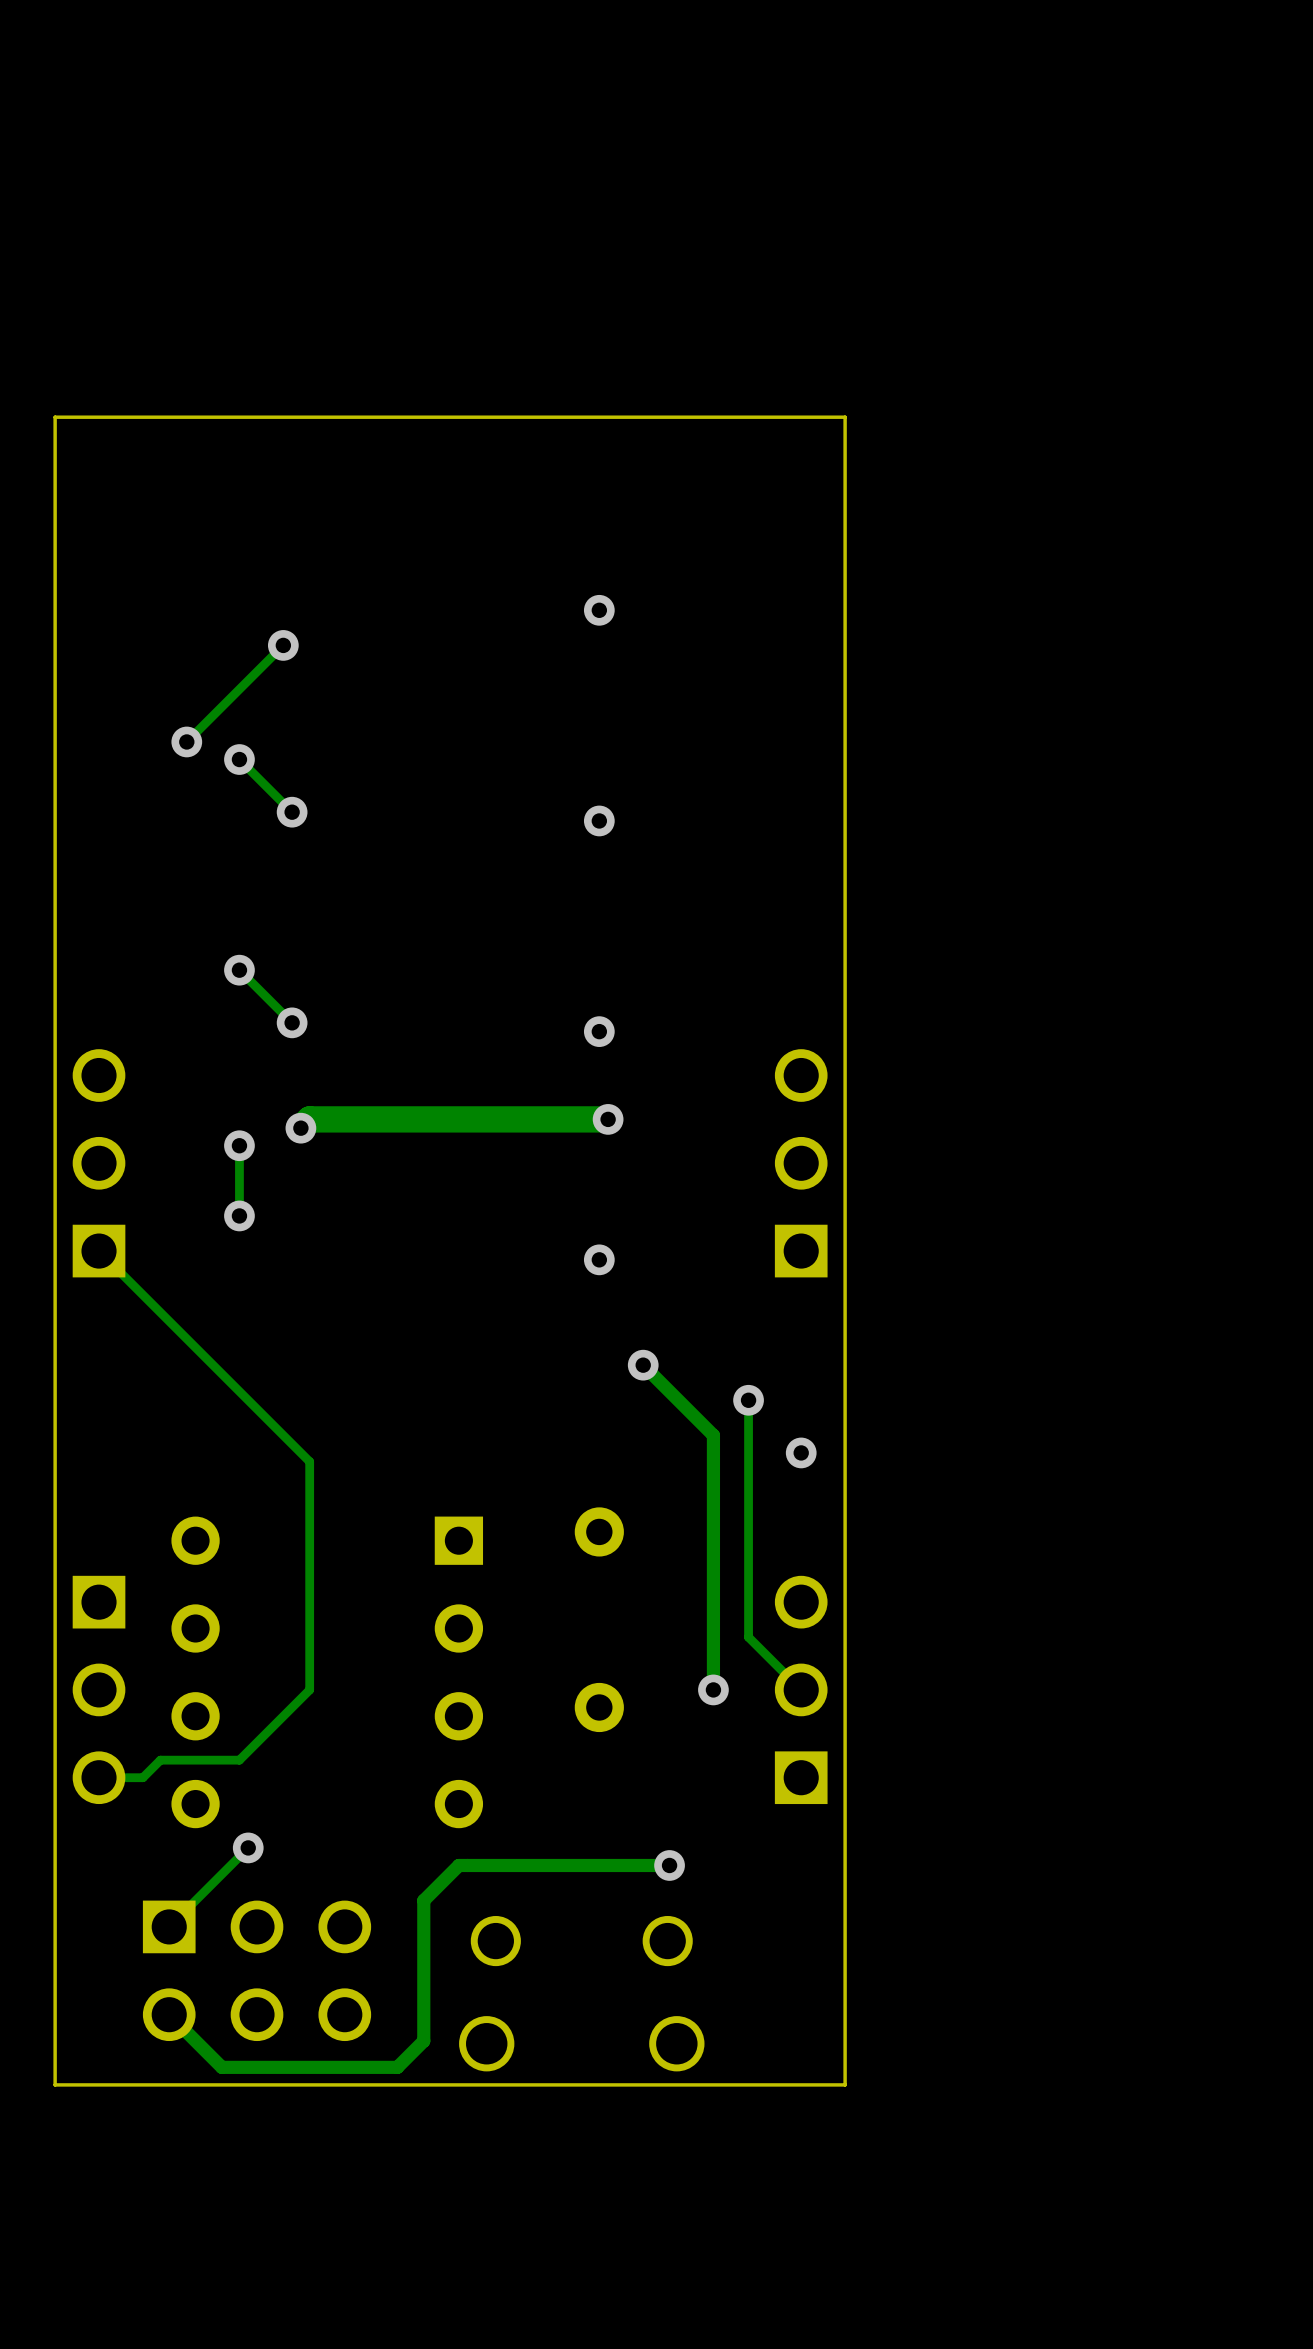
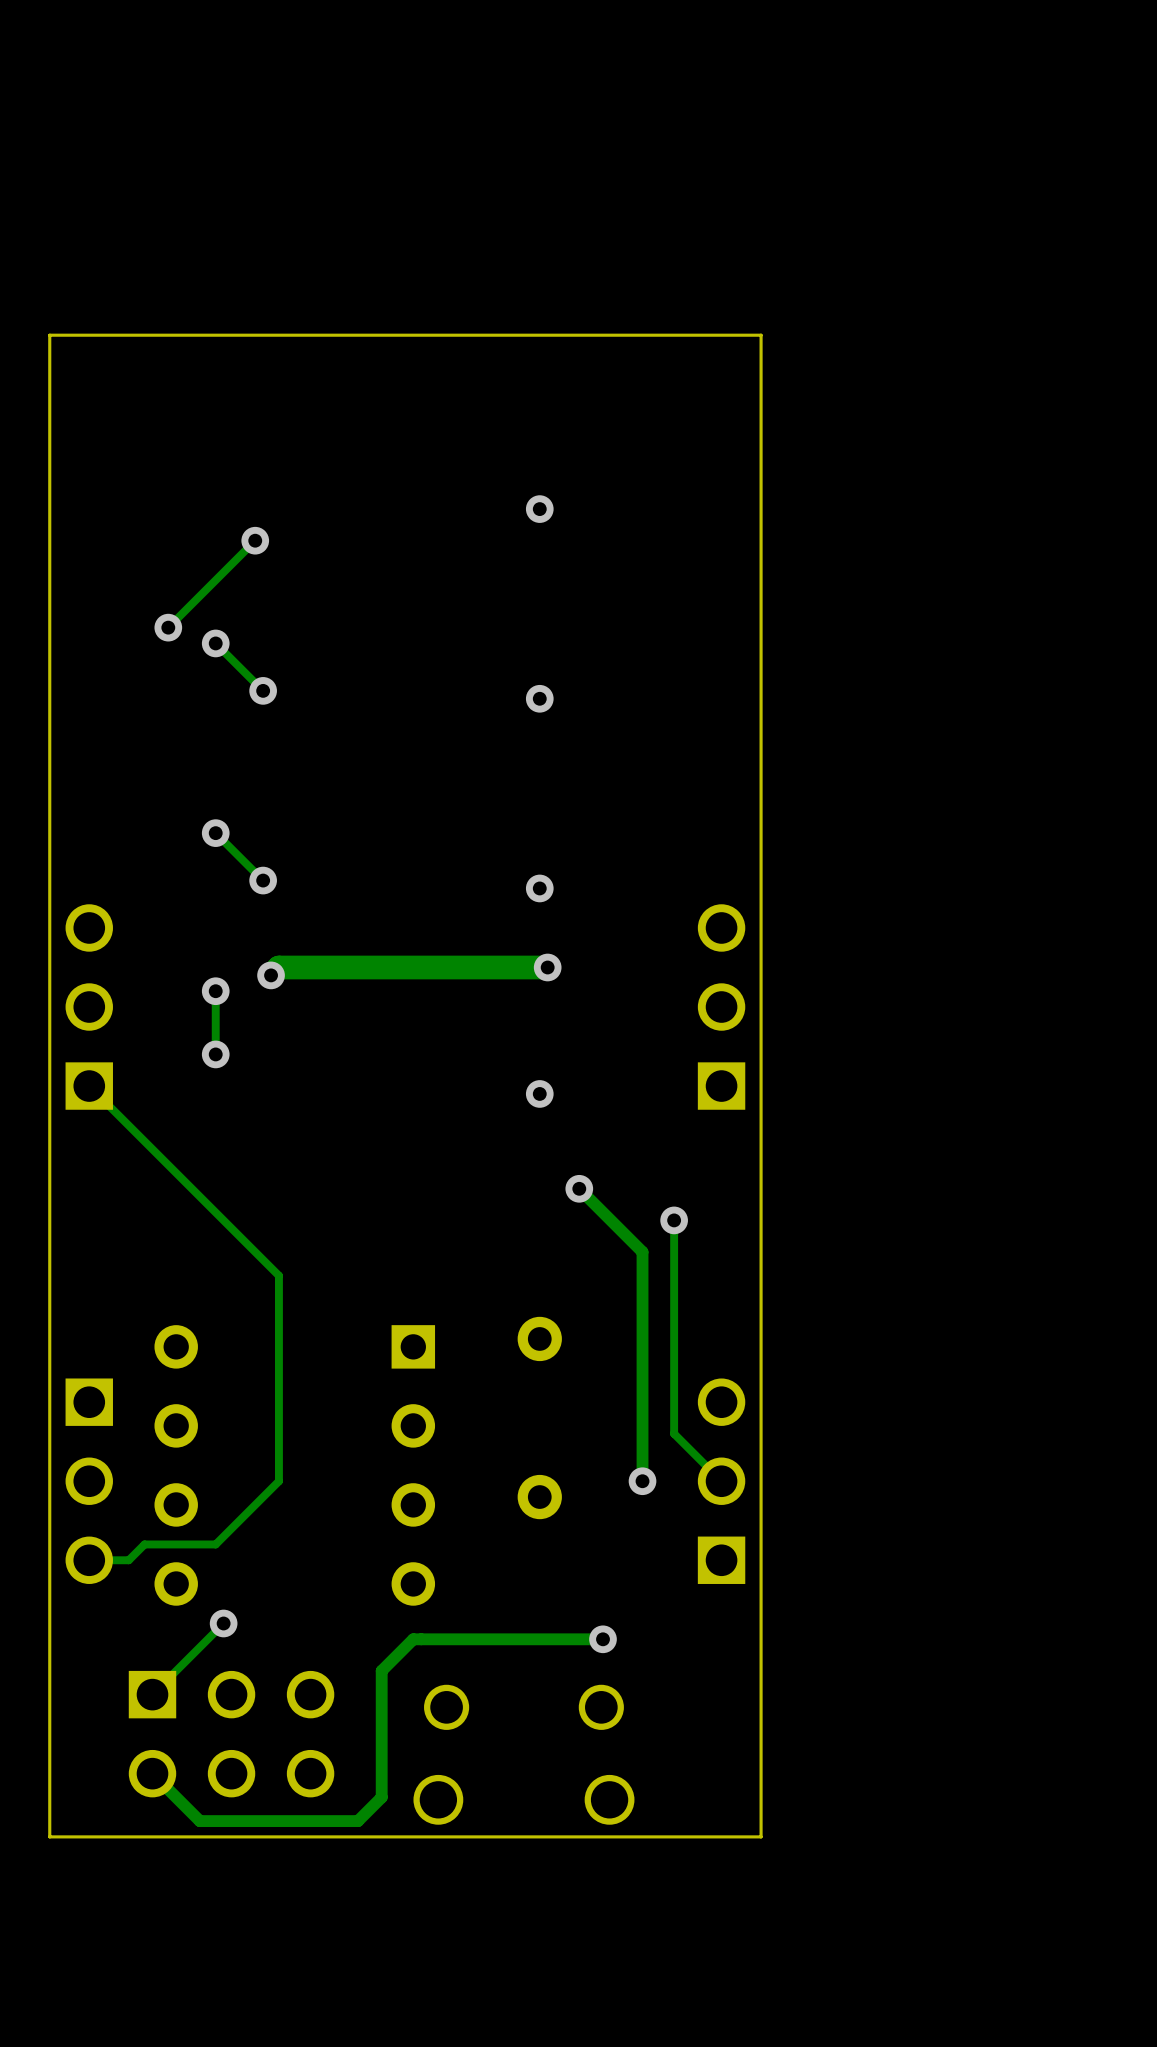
via: (801, 1452) -> none

